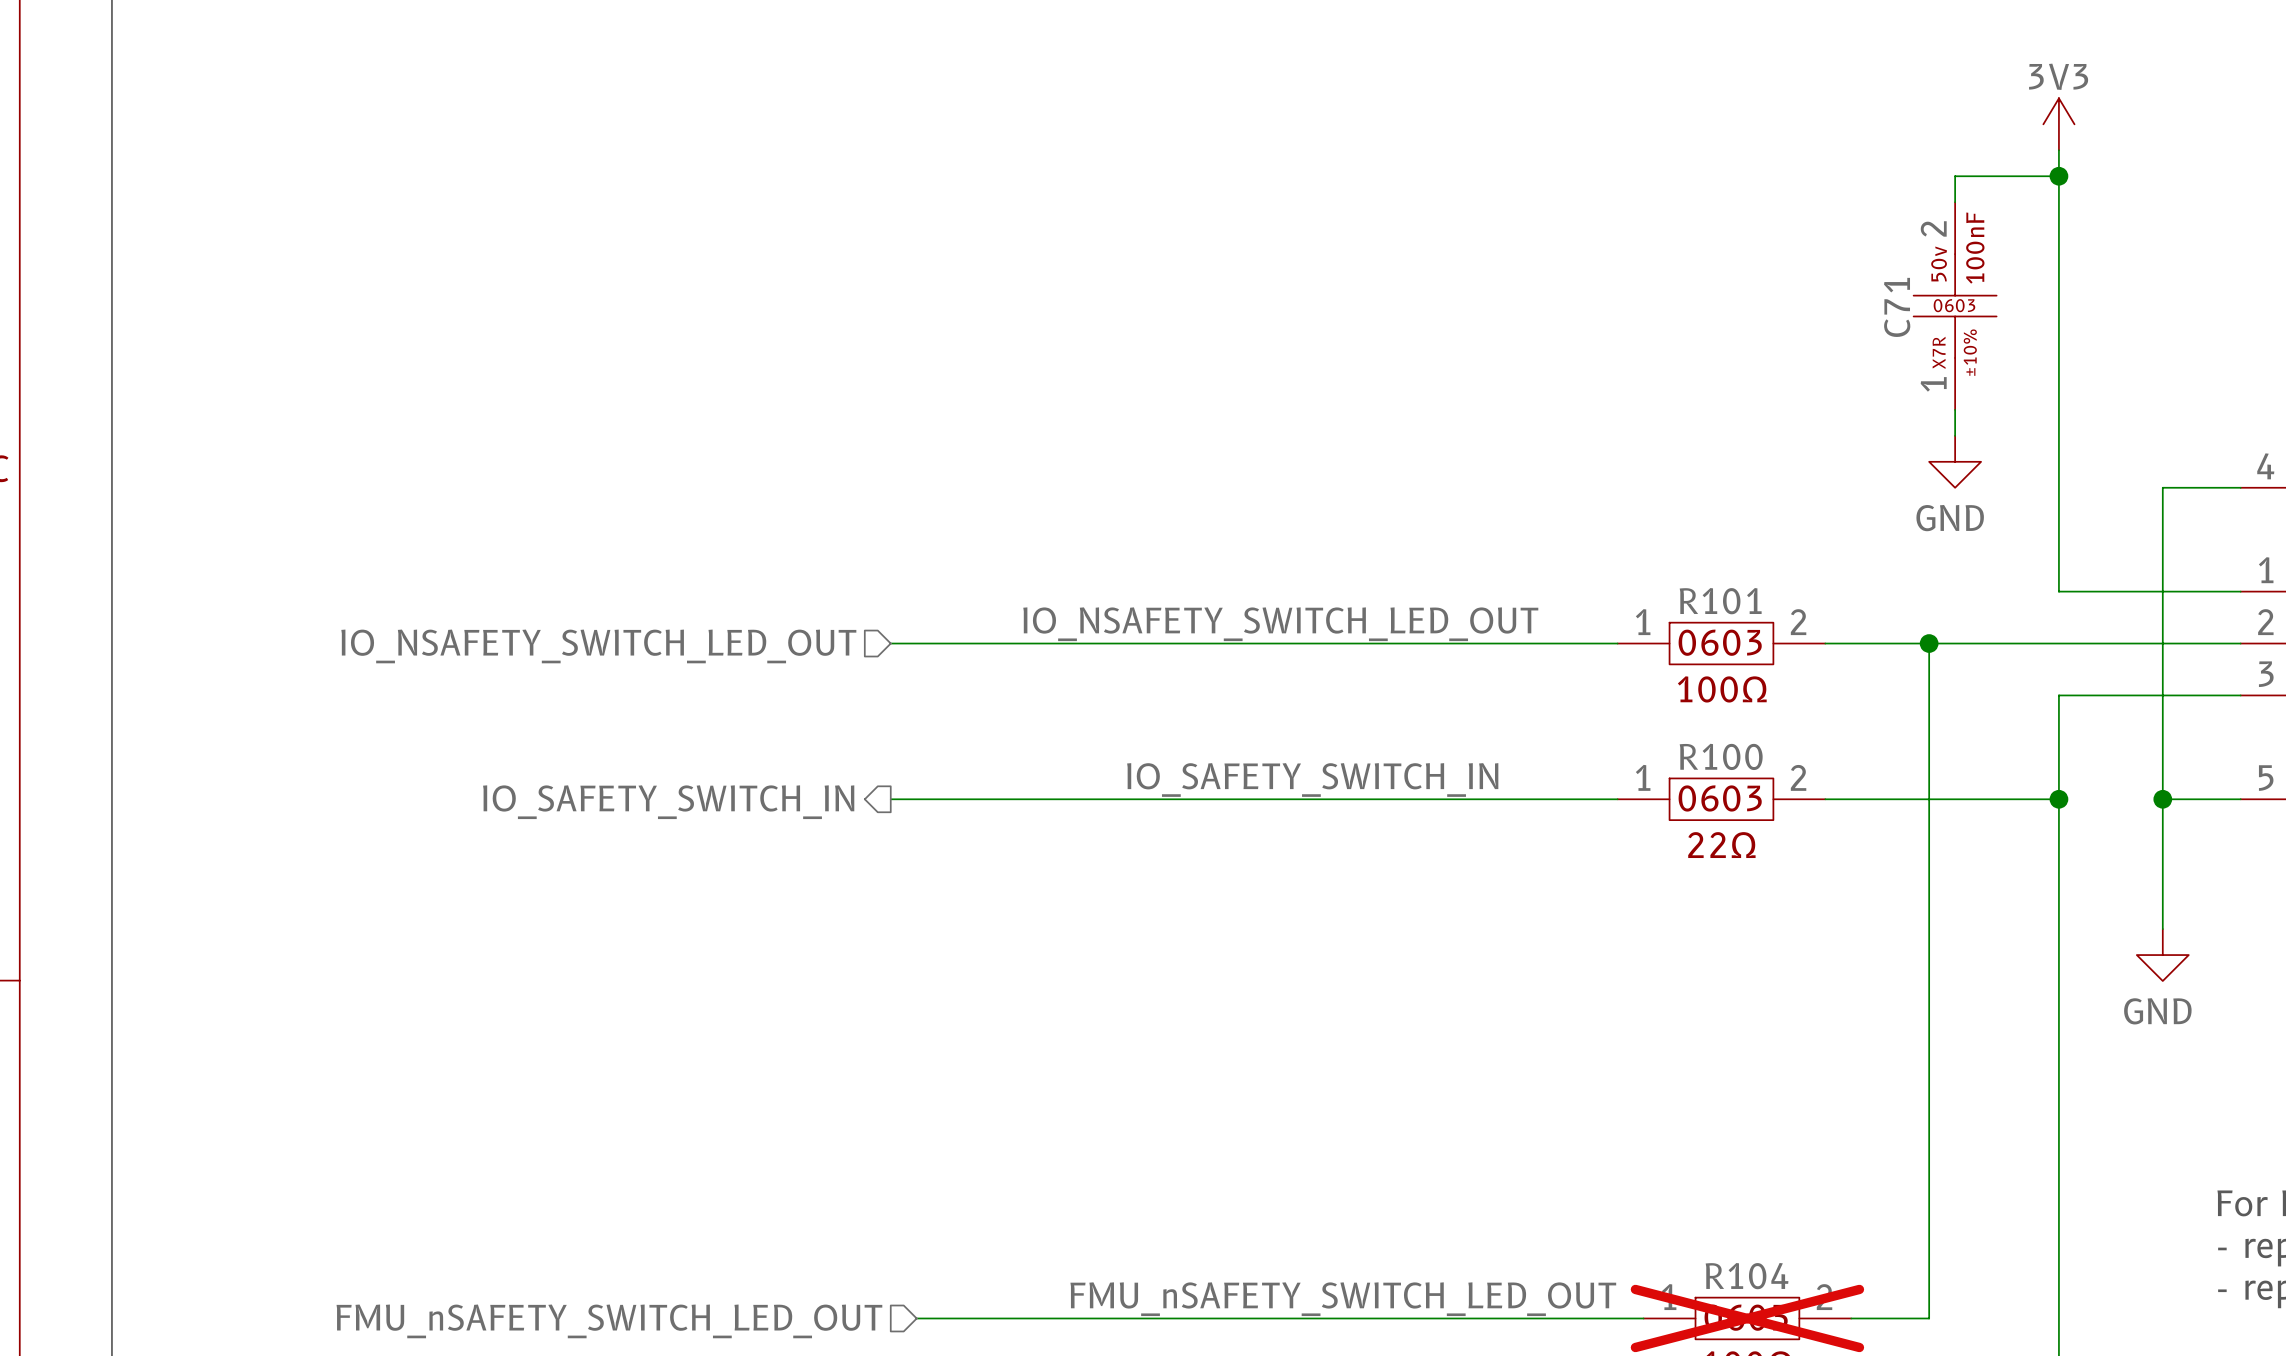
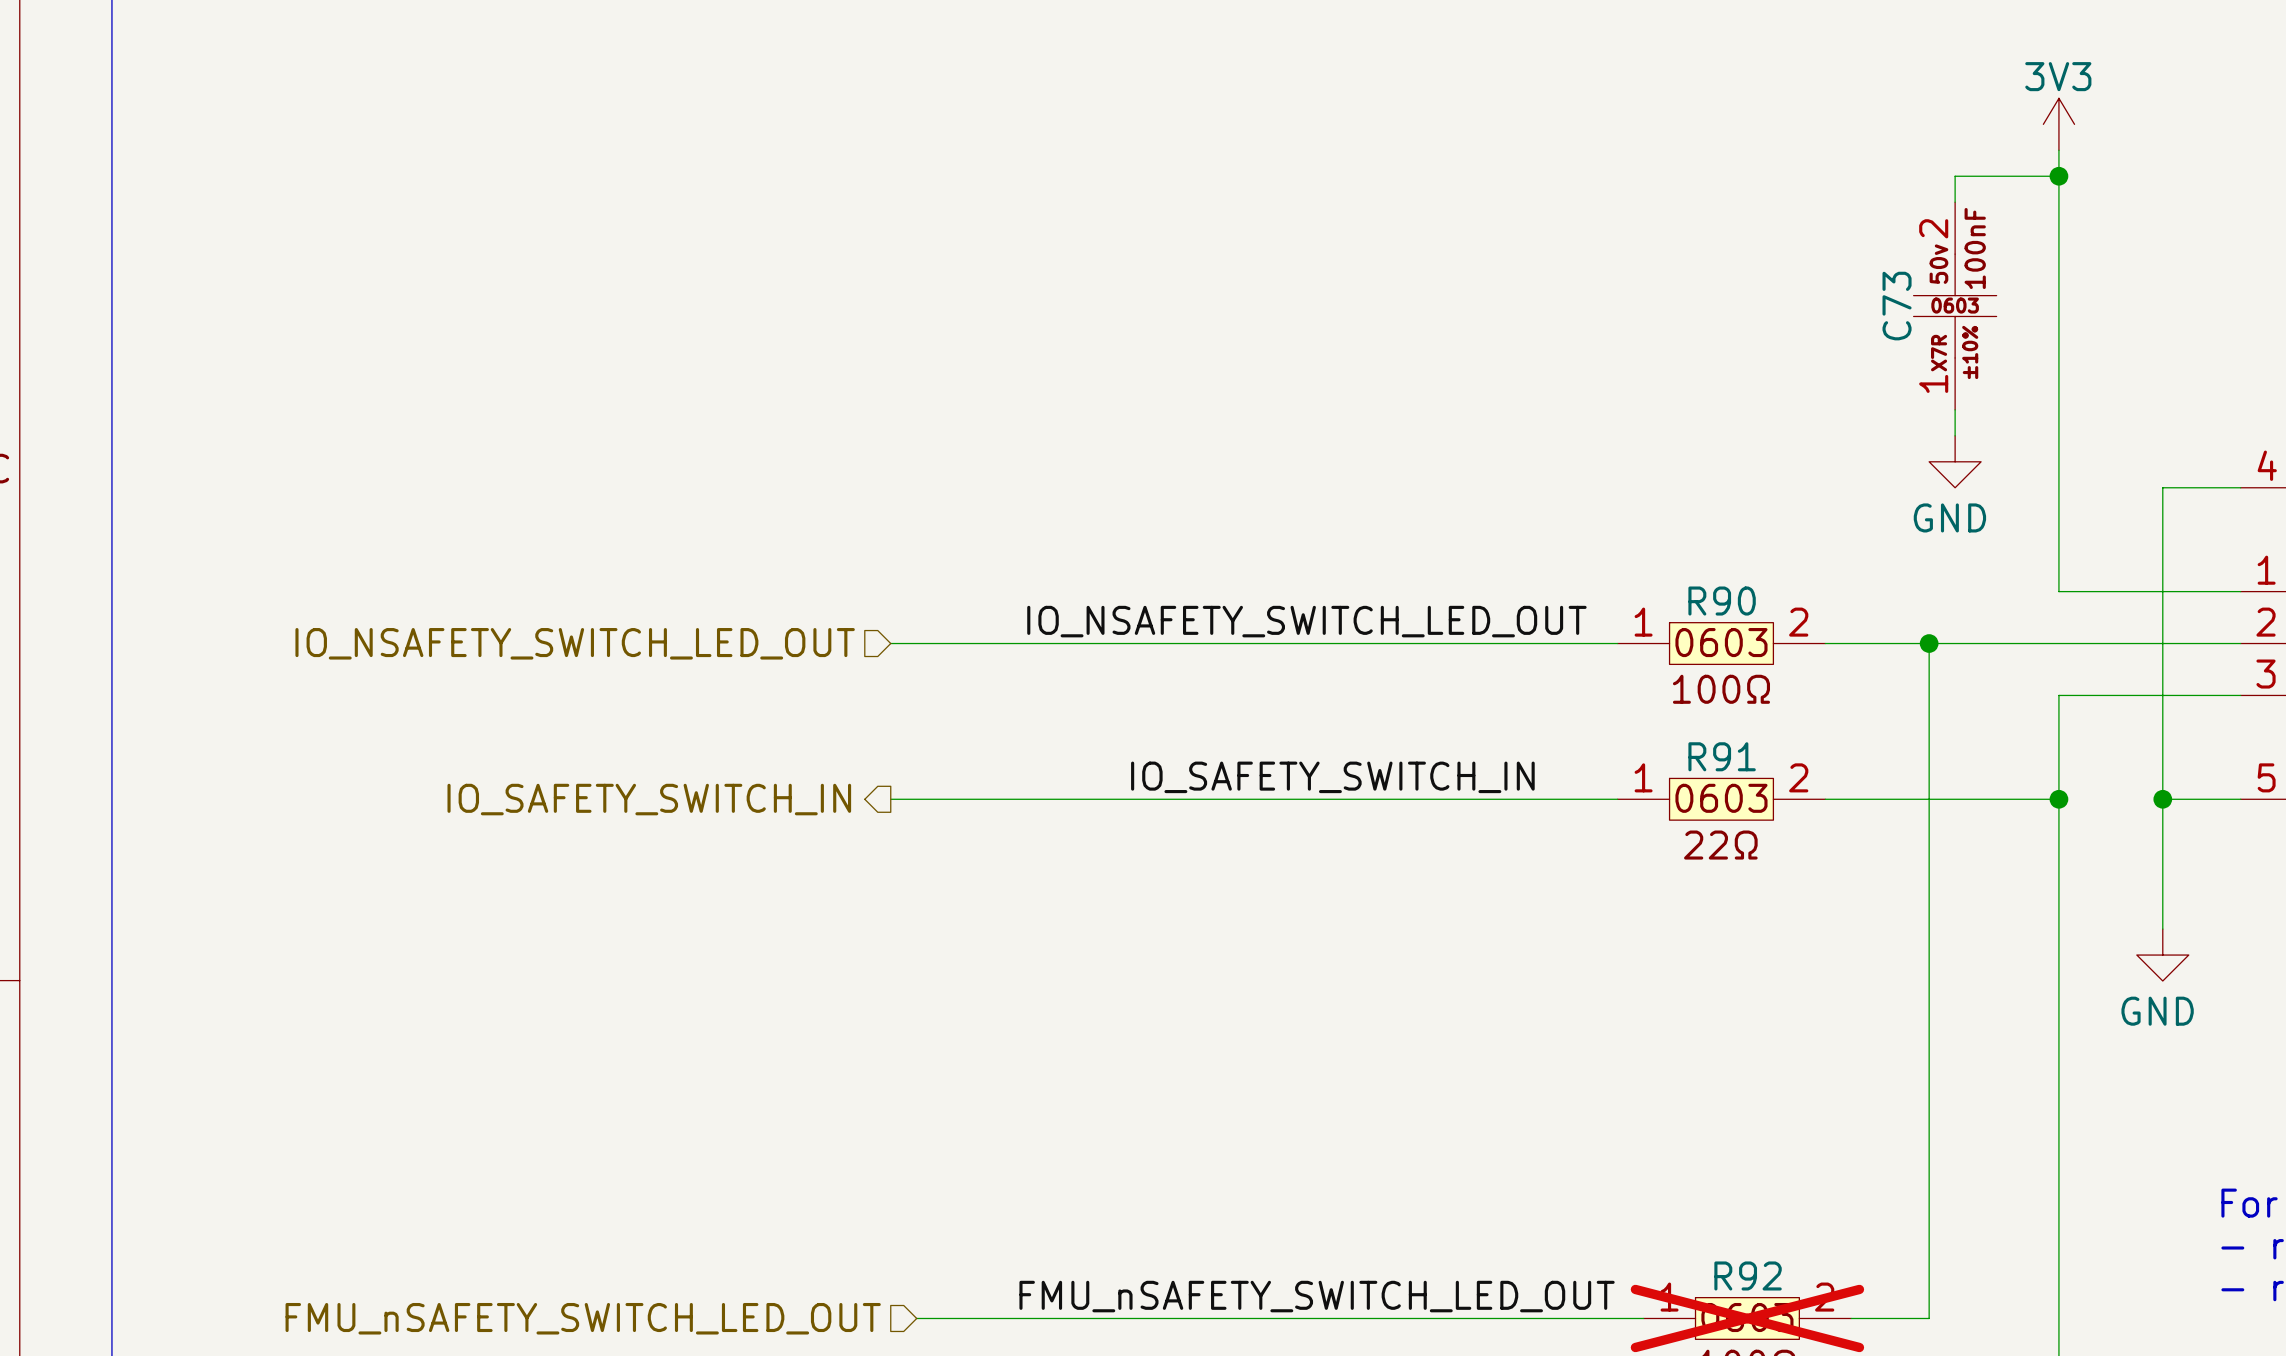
C71 name: C71 (1897, 307) -> C73 (1897, 306)
R101 name: R101 (1720, 601) -> R90 (1722, 601)
R100 name: R100 (1721, 756) -> R91 (1722, 756)
R104 name: R104 (1747, 1276) -> R92 (1748, 1275)

